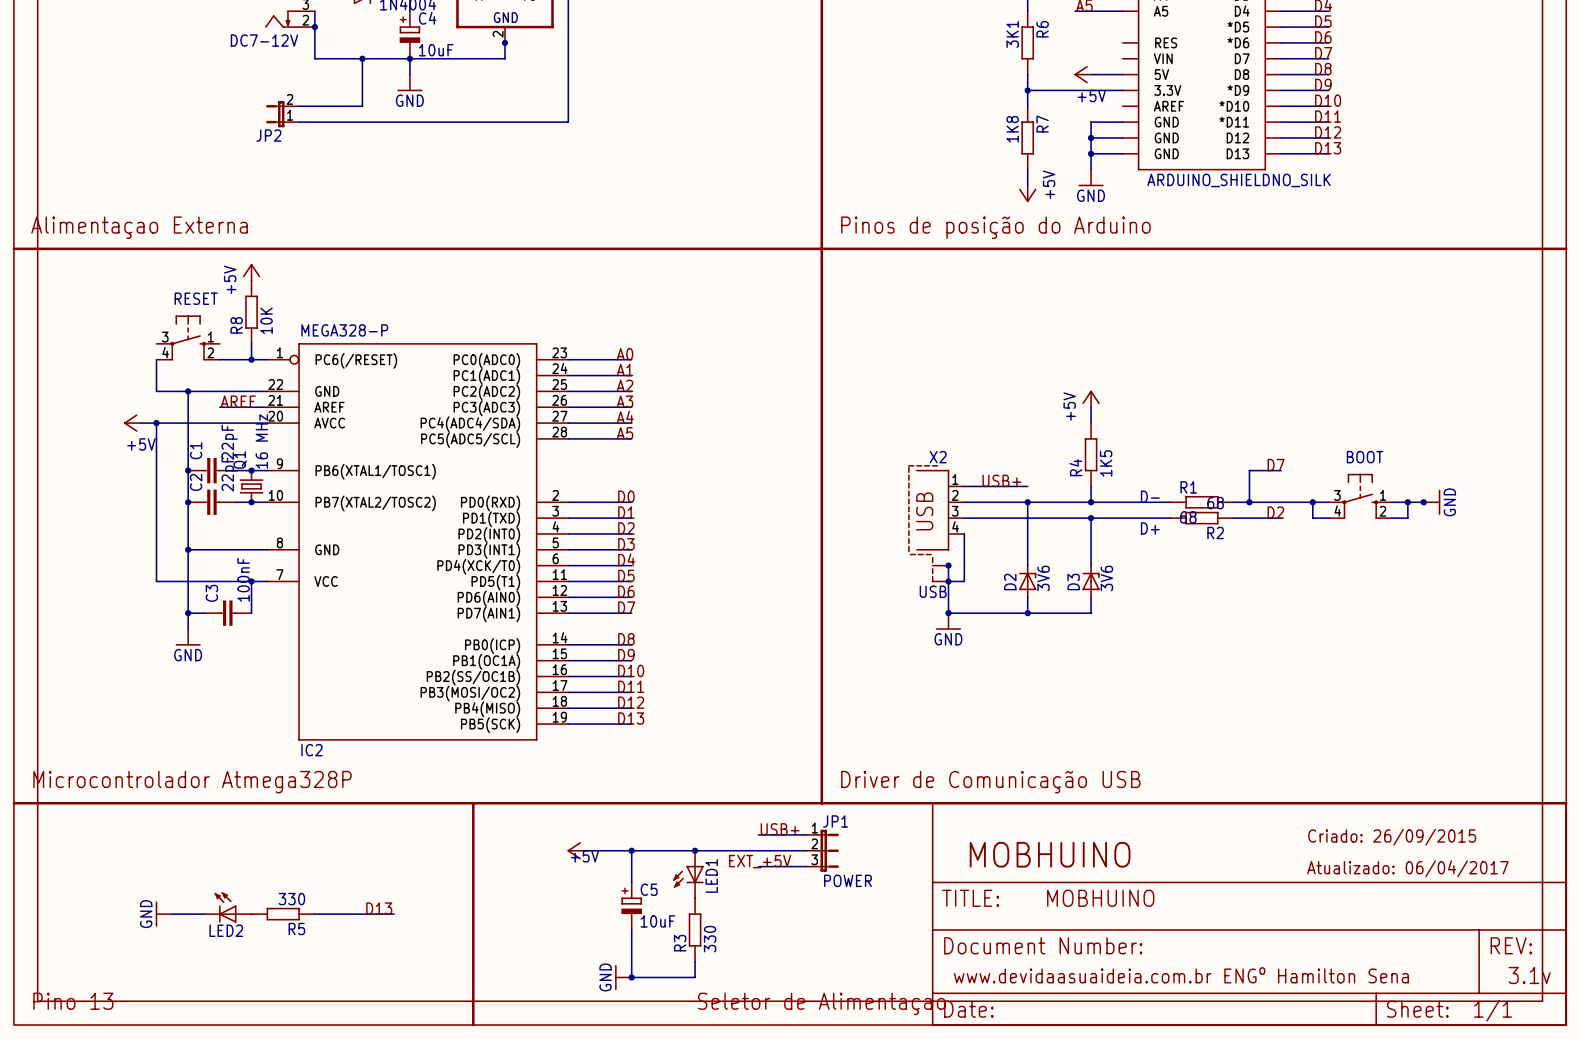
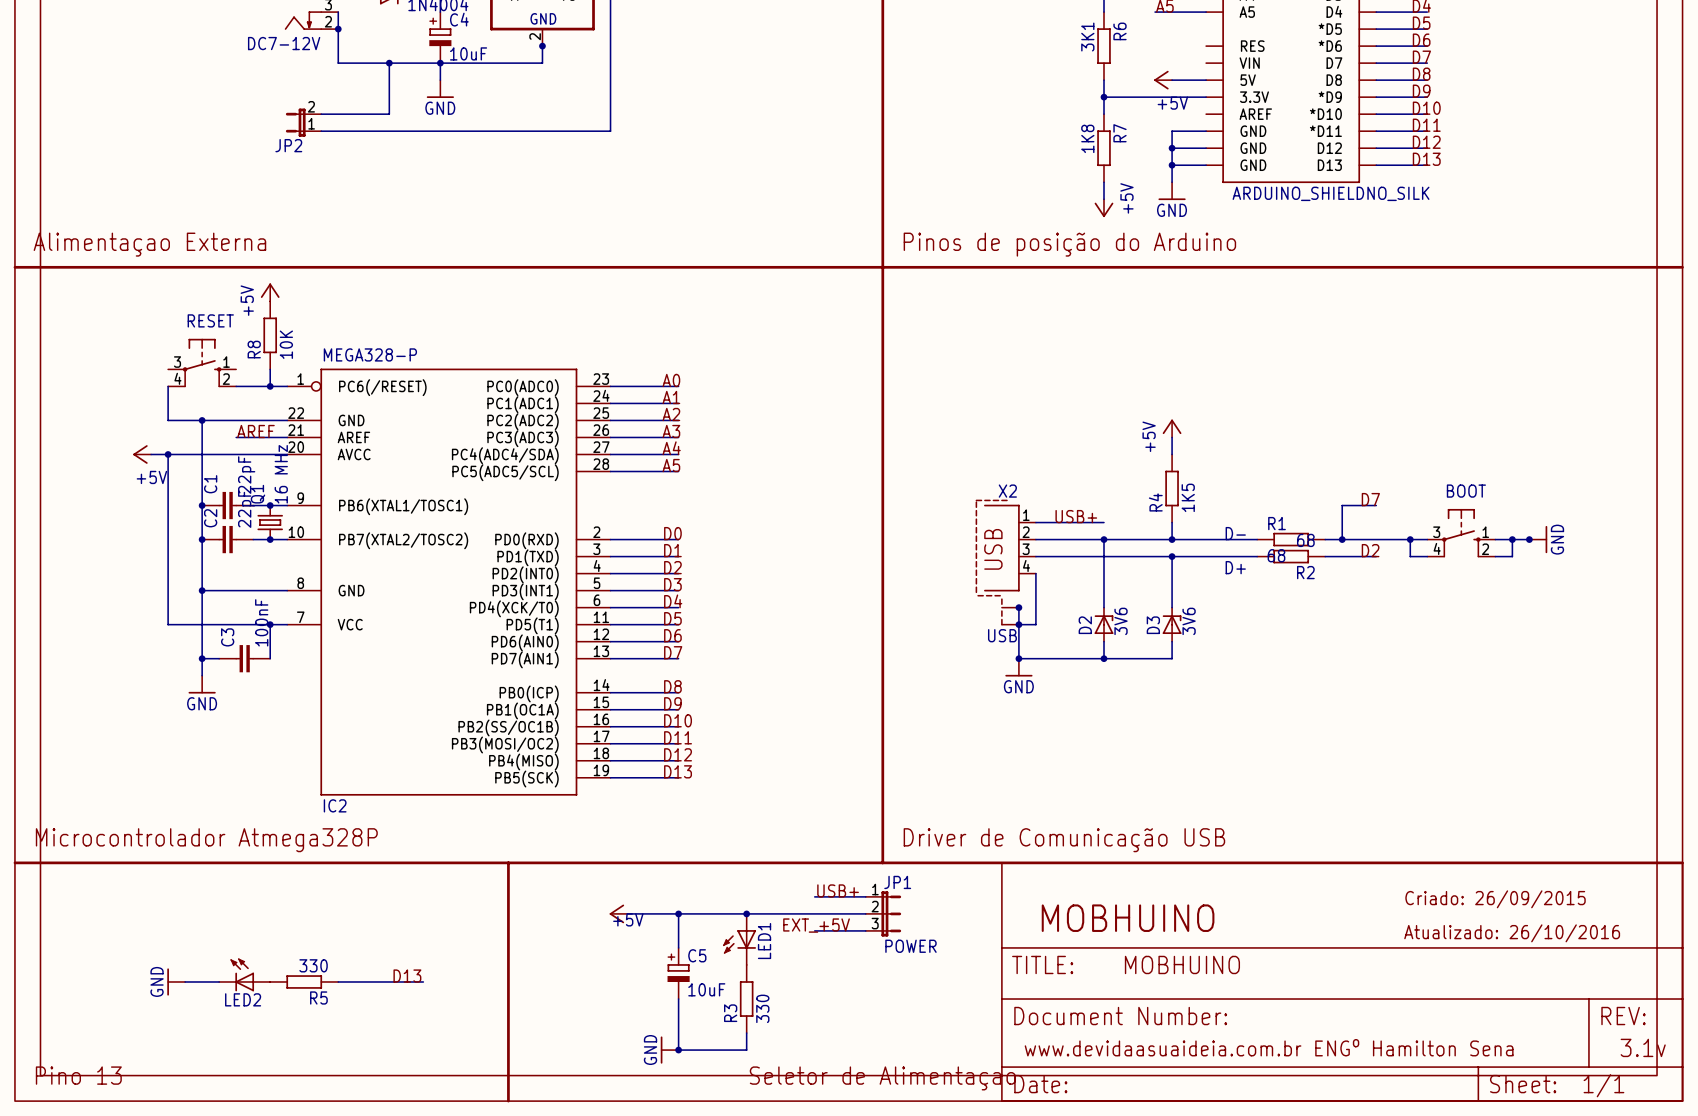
text: Atualizado: 06/04/2017 (1407, 868) -> Atualizado: 26/10/2016 (1512, 933)

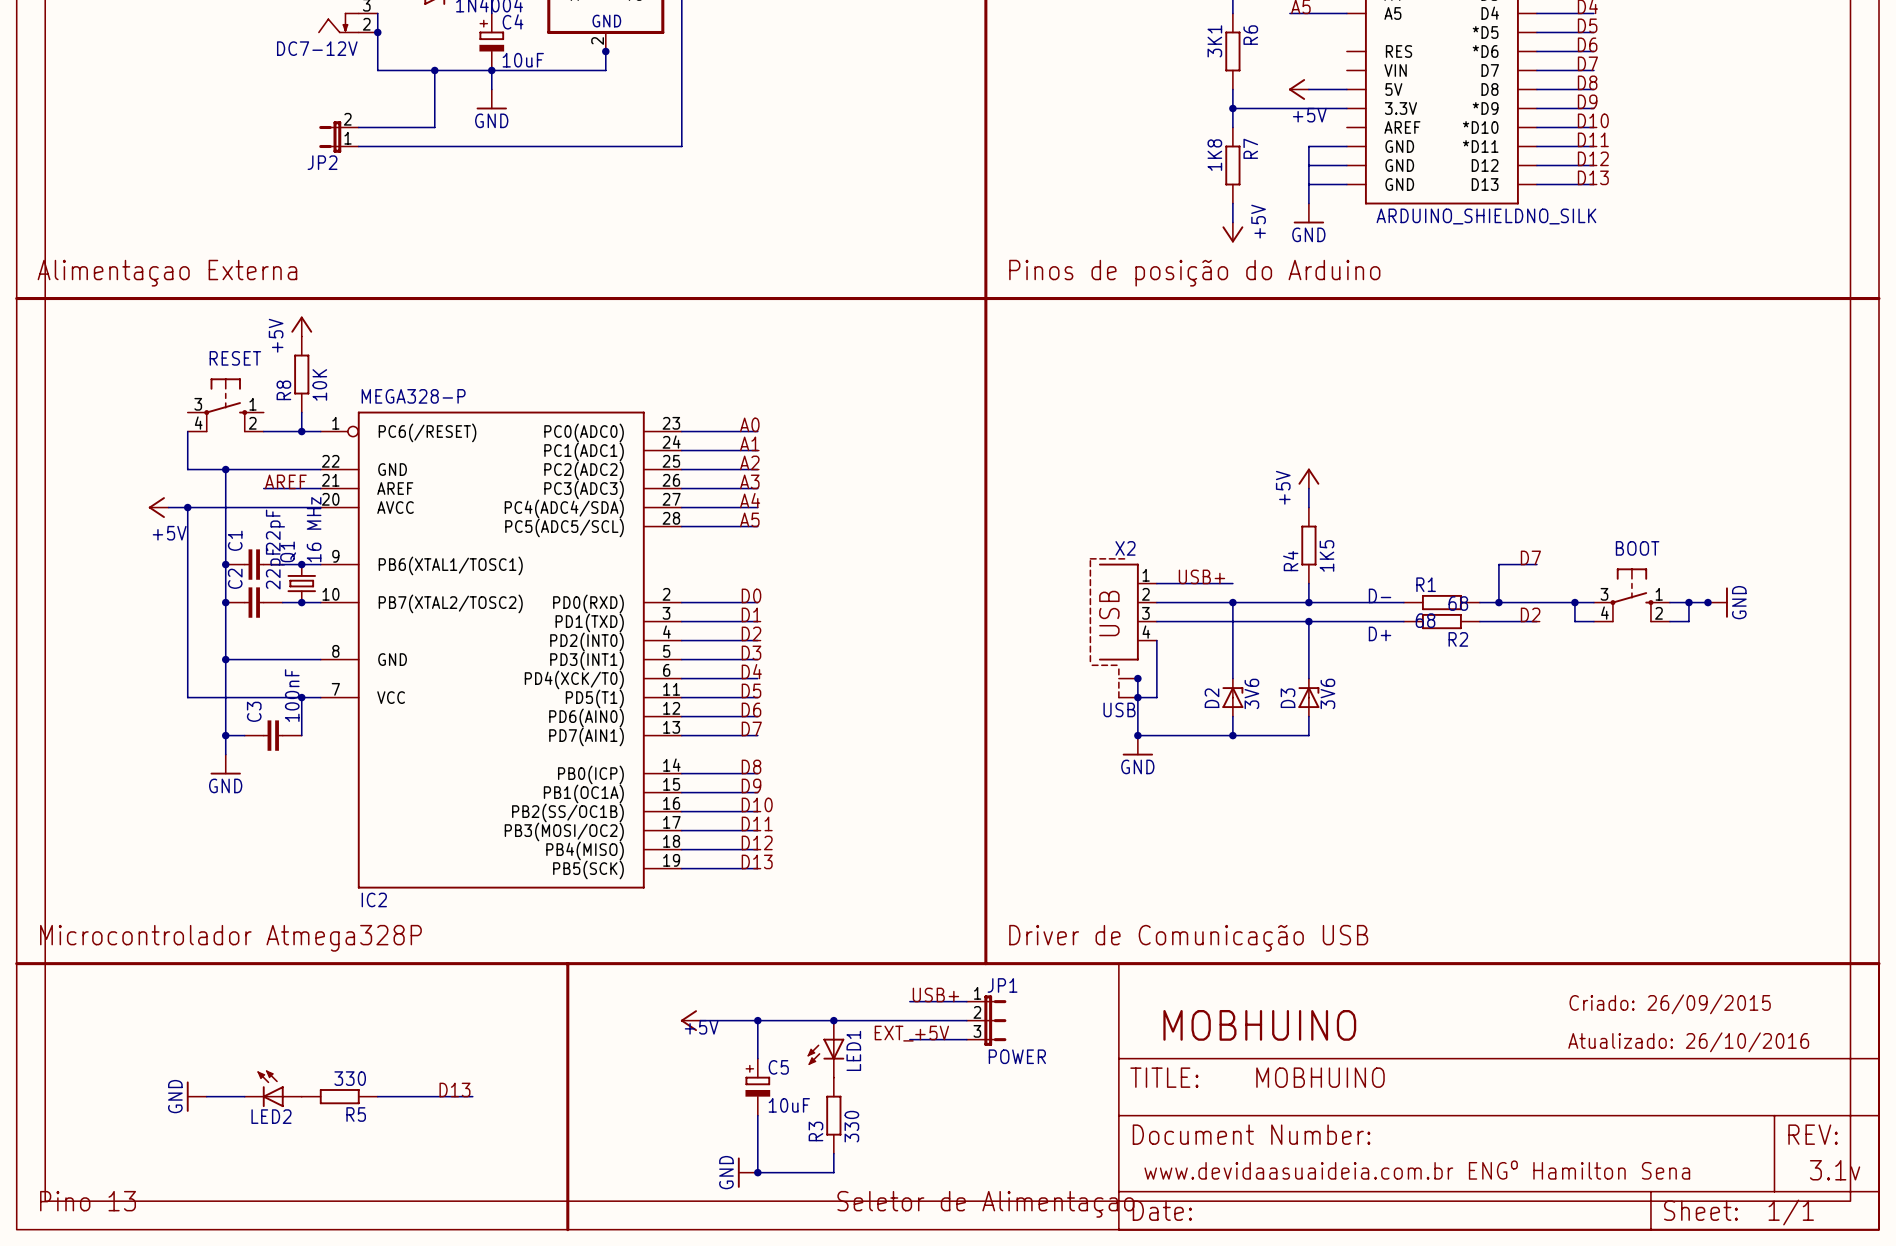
junction: (1172, 148) -> none
junction: (1172, 165) -> none

